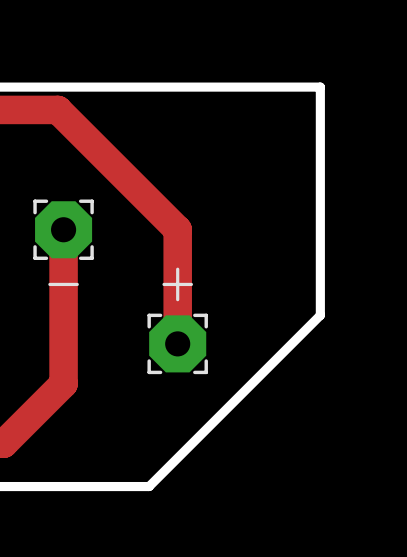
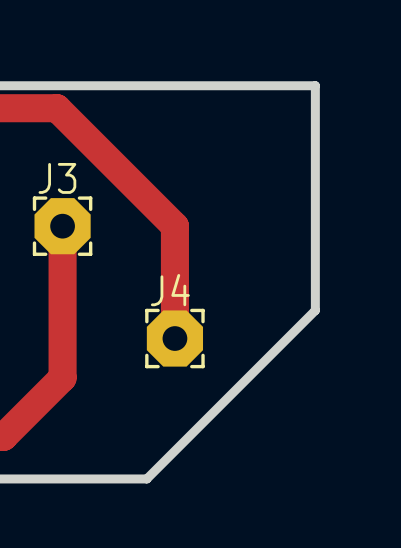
J3 name: none -> J3 (57, 178)
text: - (63, 284) -> none
text: + (177, 284) -> none
J4 name: none -> J4 (170, 290)

